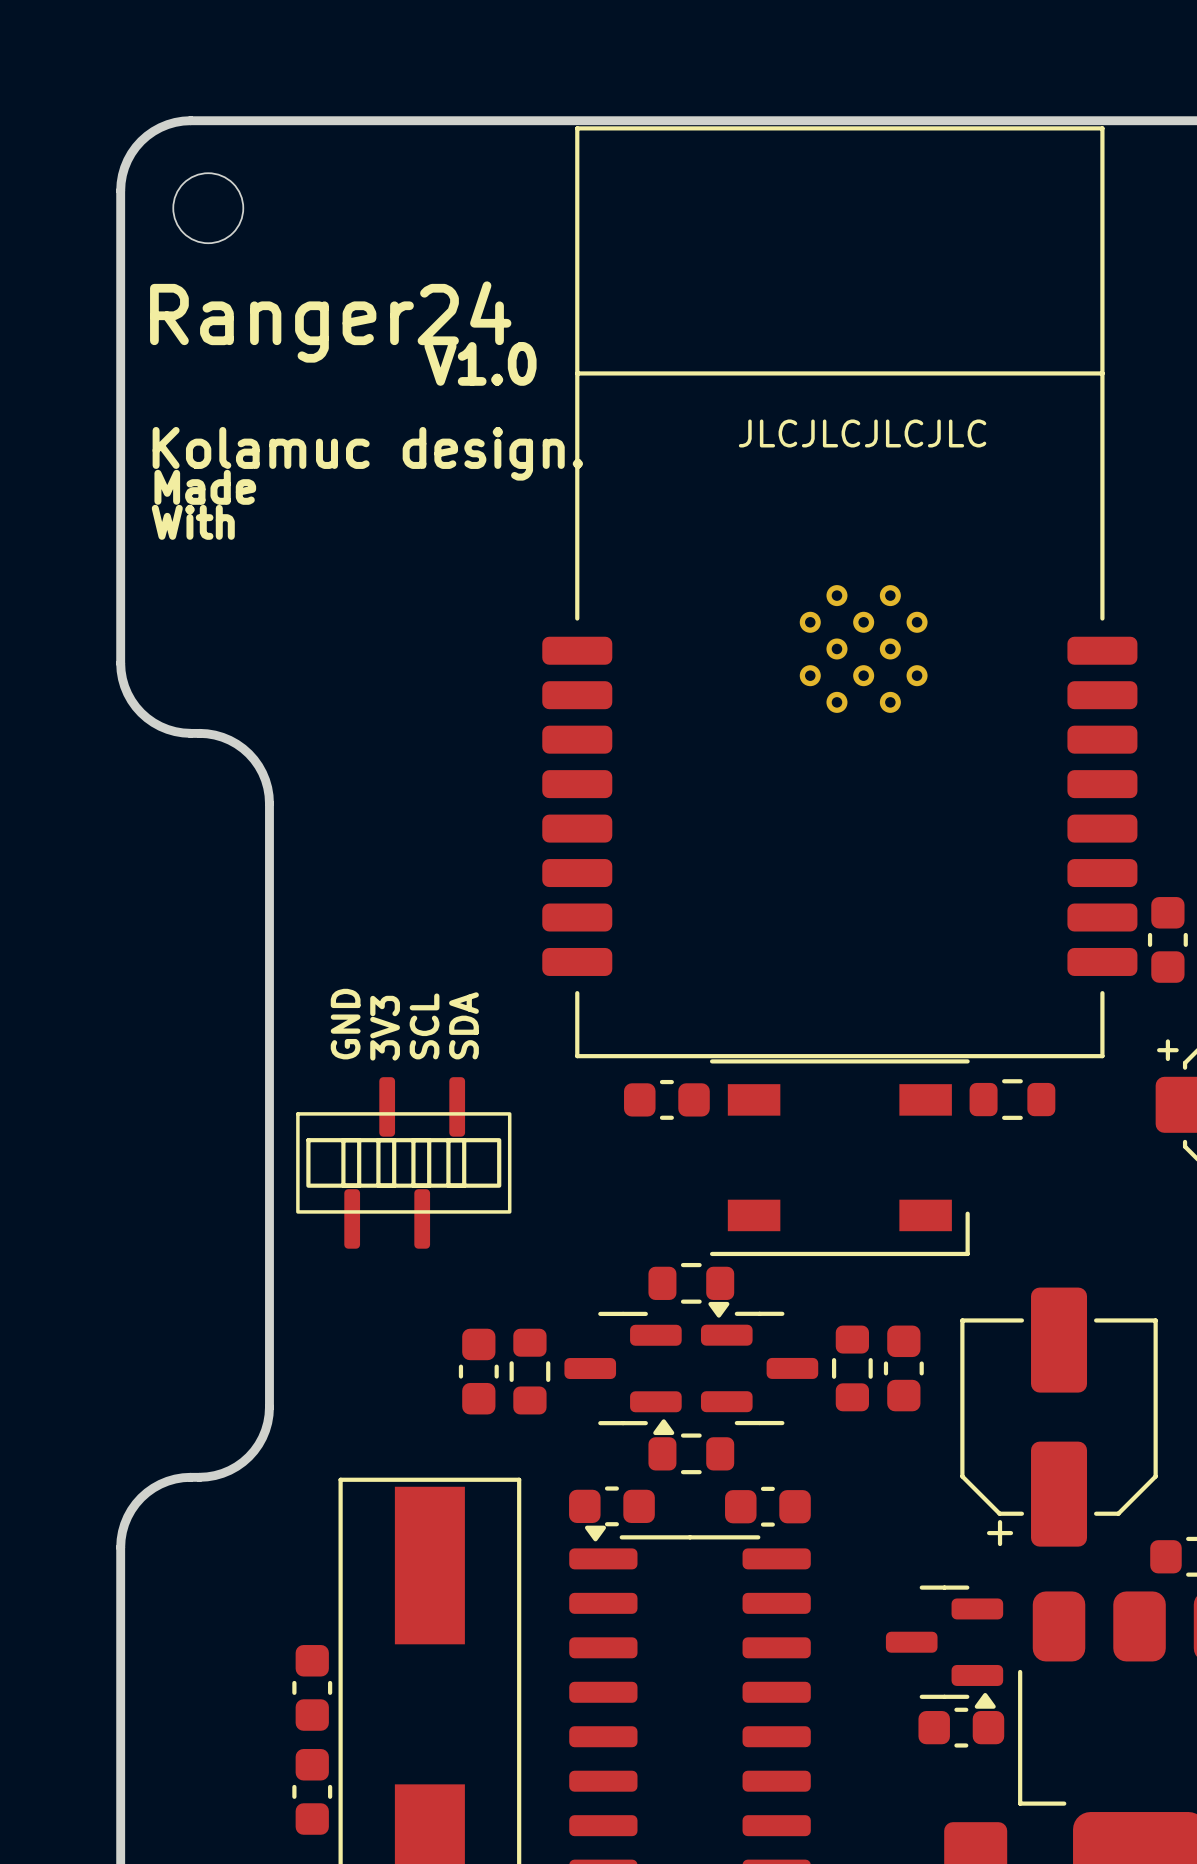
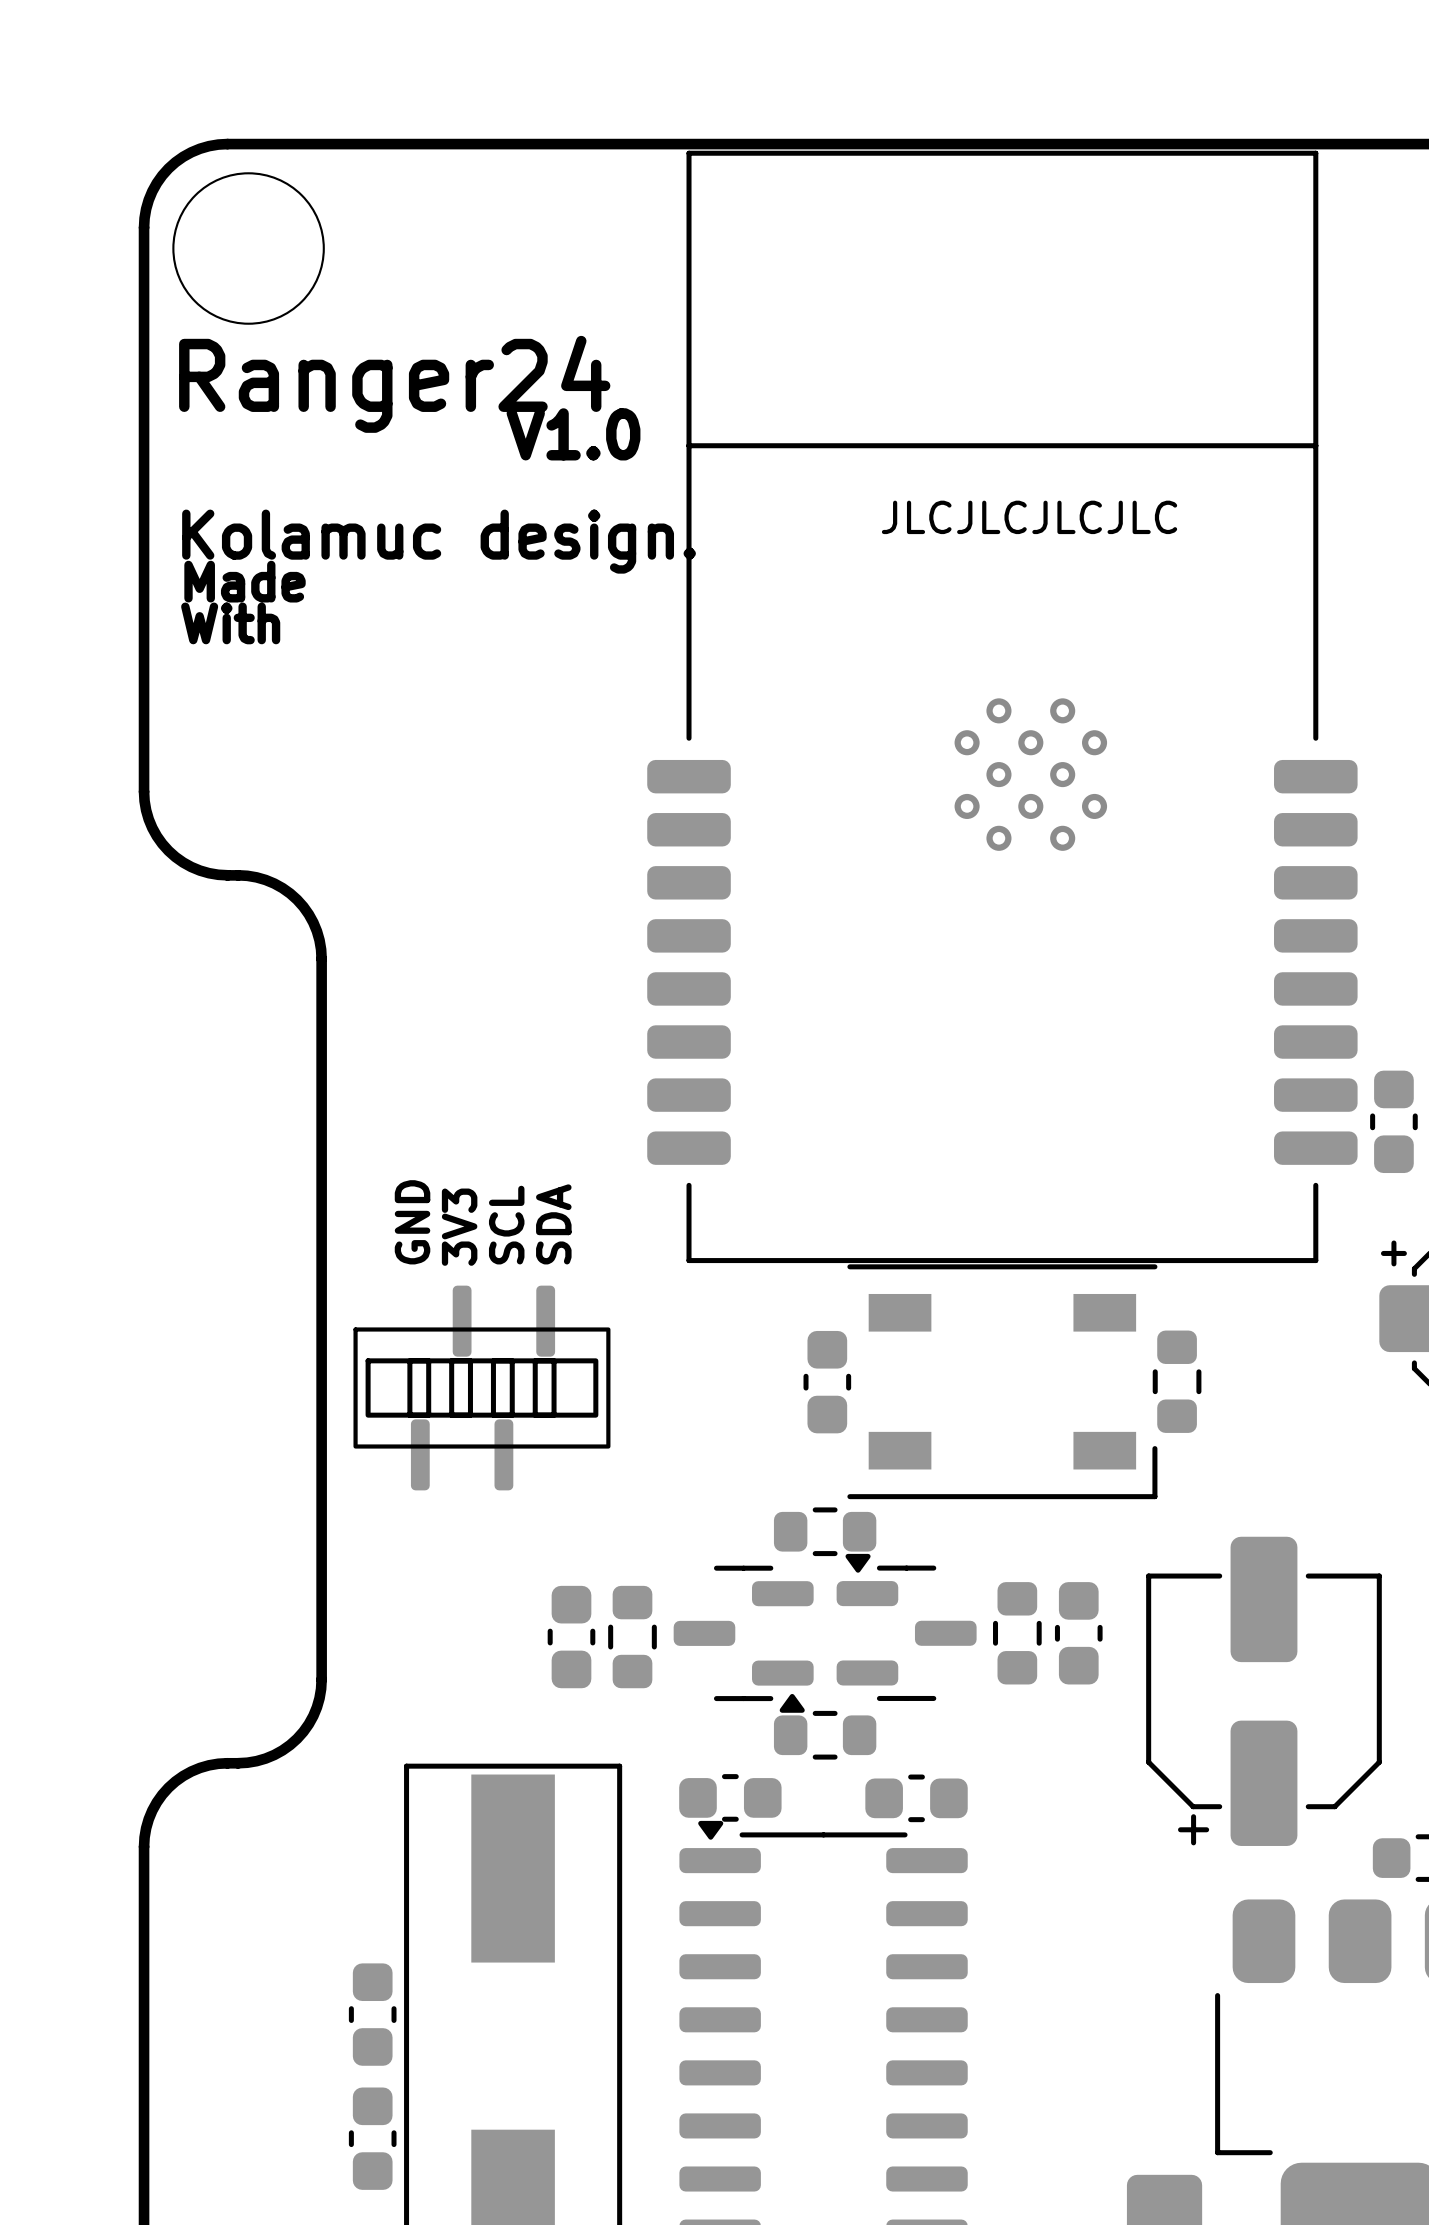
round board edge size: [172, 172, 245, 245] -> [172, 172, 325, 325]
part rotation: 0° (666, 1099) -> 90° clockwise (827, 1382)
part position: (666, 1099) -> (827, 1382)
part rotation: 0° (1012, 1099) -> 90° clockwise (1177, 1381)
part position: (1012, 1099) -> (1177, 1381)
part: (944, 1647) -> none
part: (961, 1727) -> none

